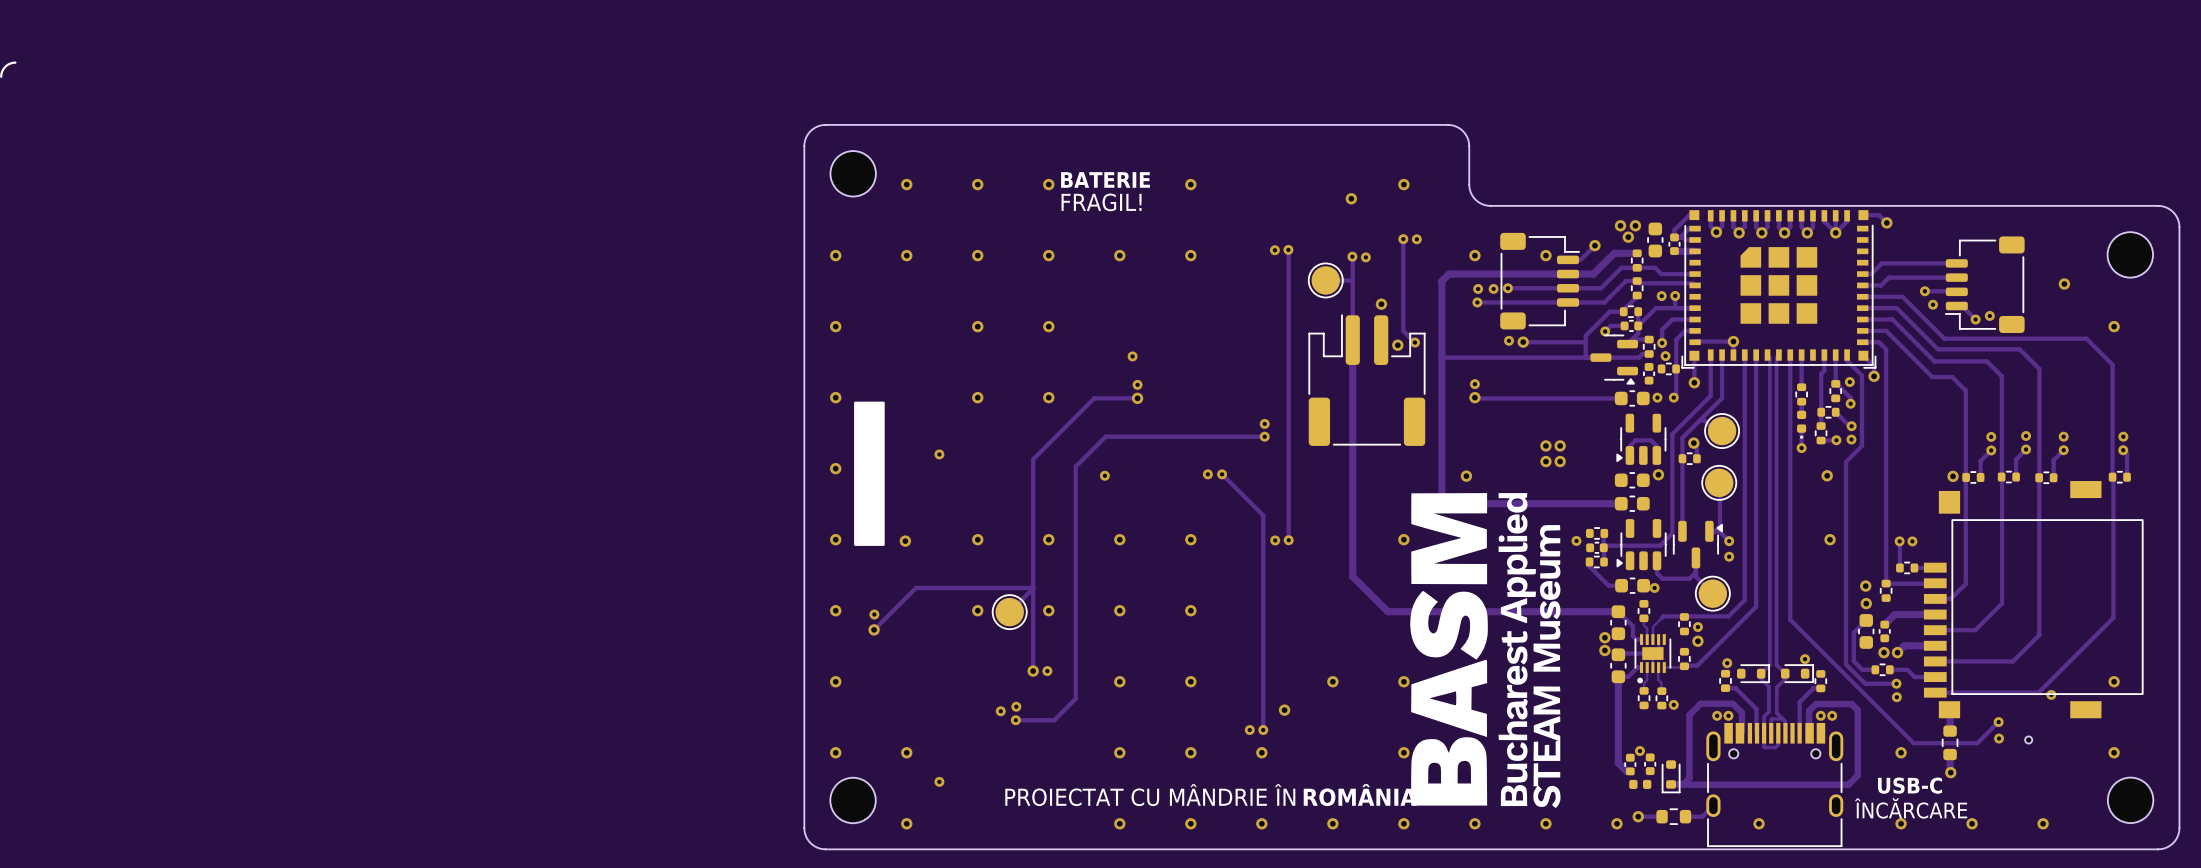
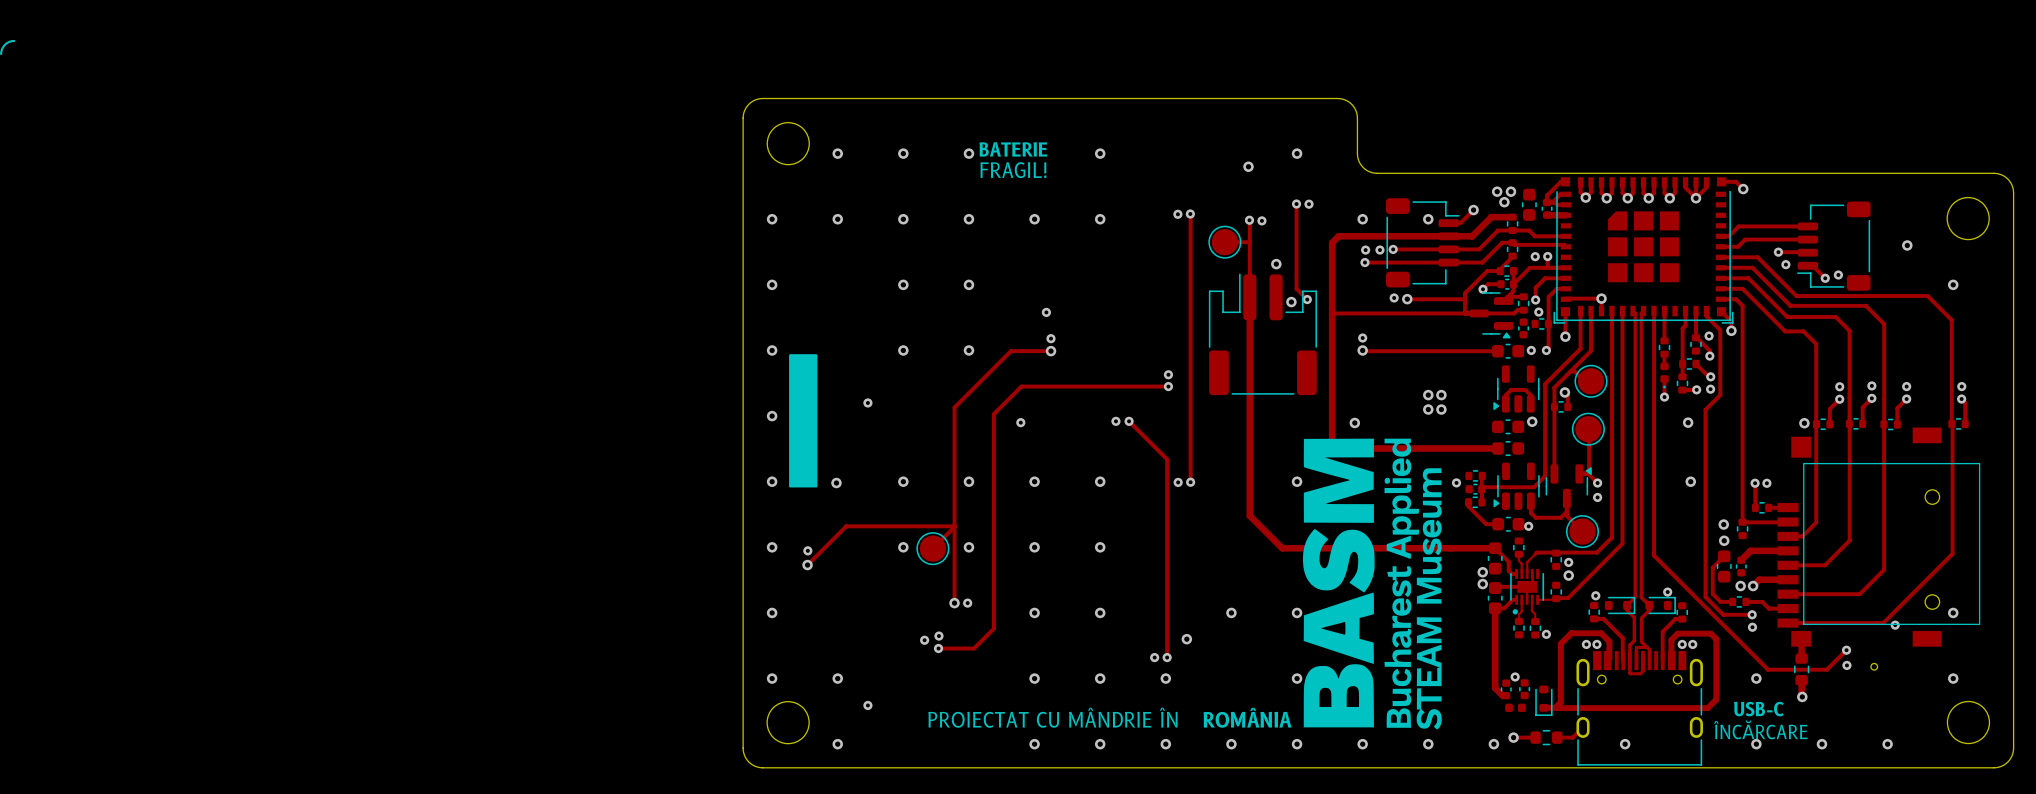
part footprint: [1923, 481, 2144, 719] -> [1777, 427, 1981, 647]

